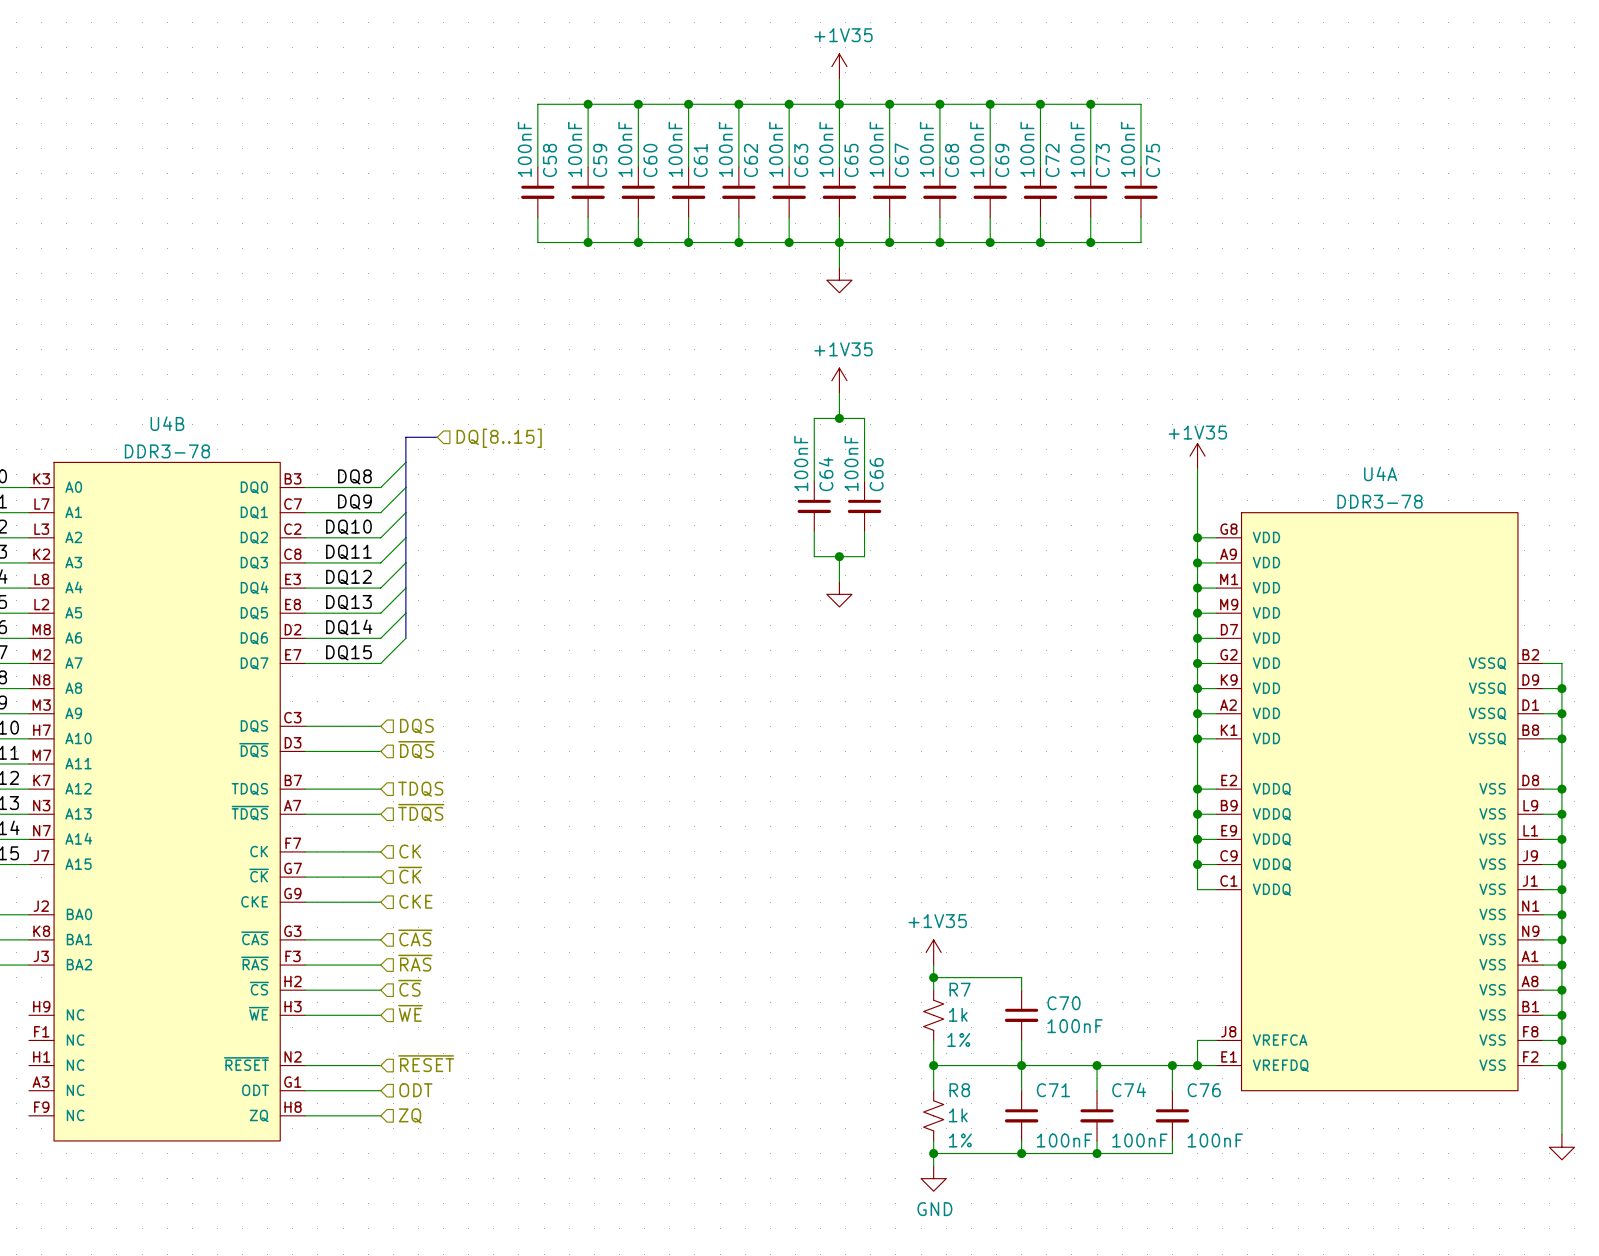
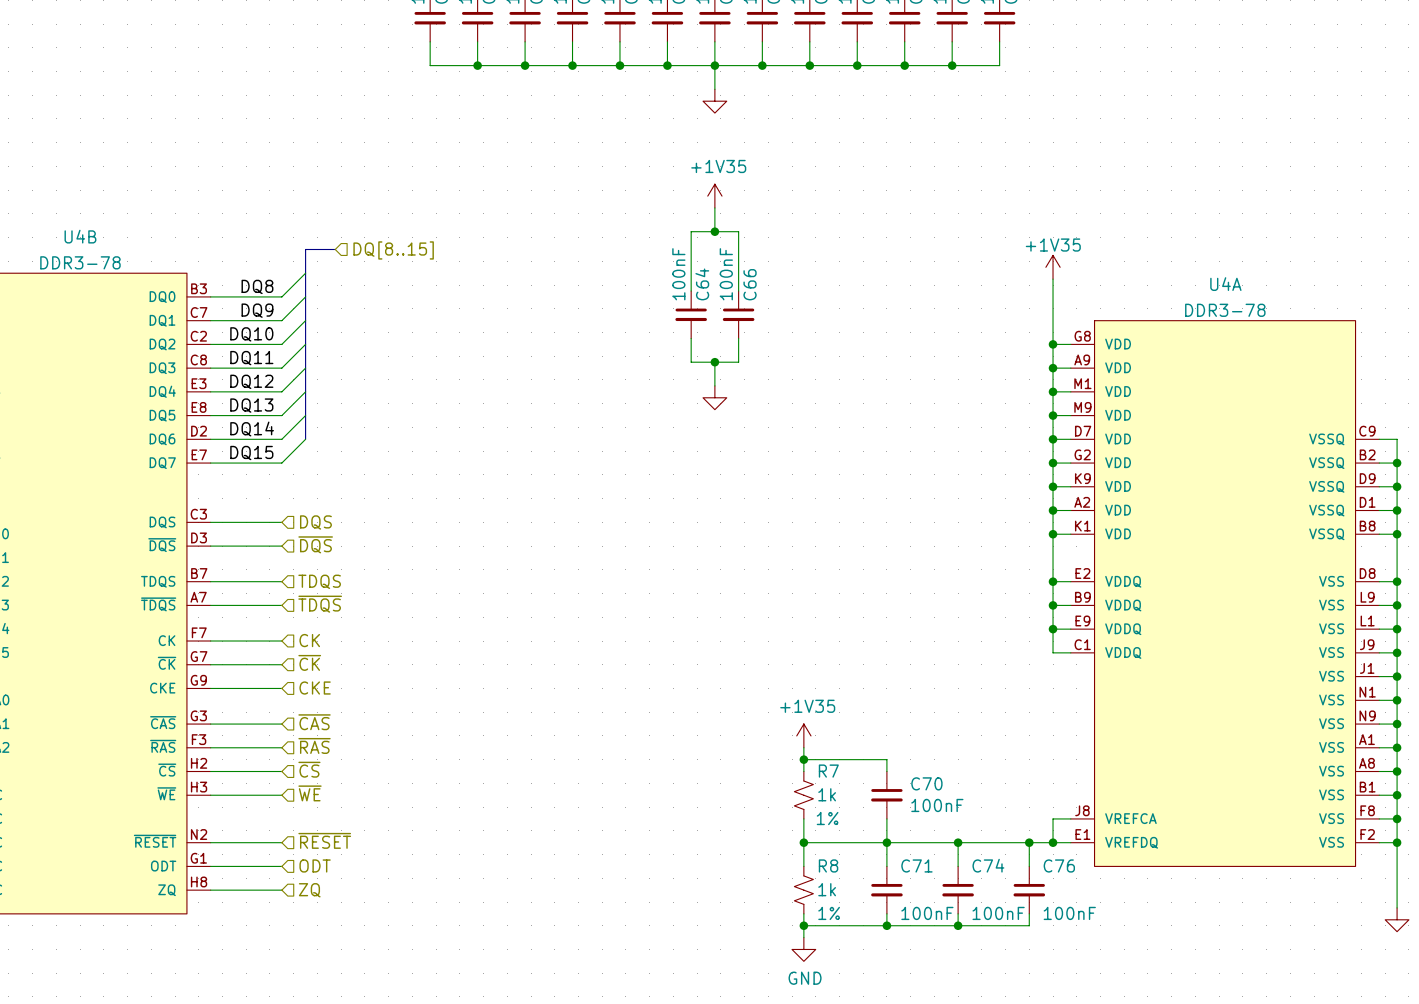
U4A symbol: [1216, 512, 1544, 1091] -> [1070, 320, 1380, 867]
wire: none -> (1379, 439) (1397, 439) (1397, 463)
junction: none -> (1397, 463)
wire: (1197, 864) (1197, 889) (1216, 889) -> none
junction: (1197, 864) -> none

